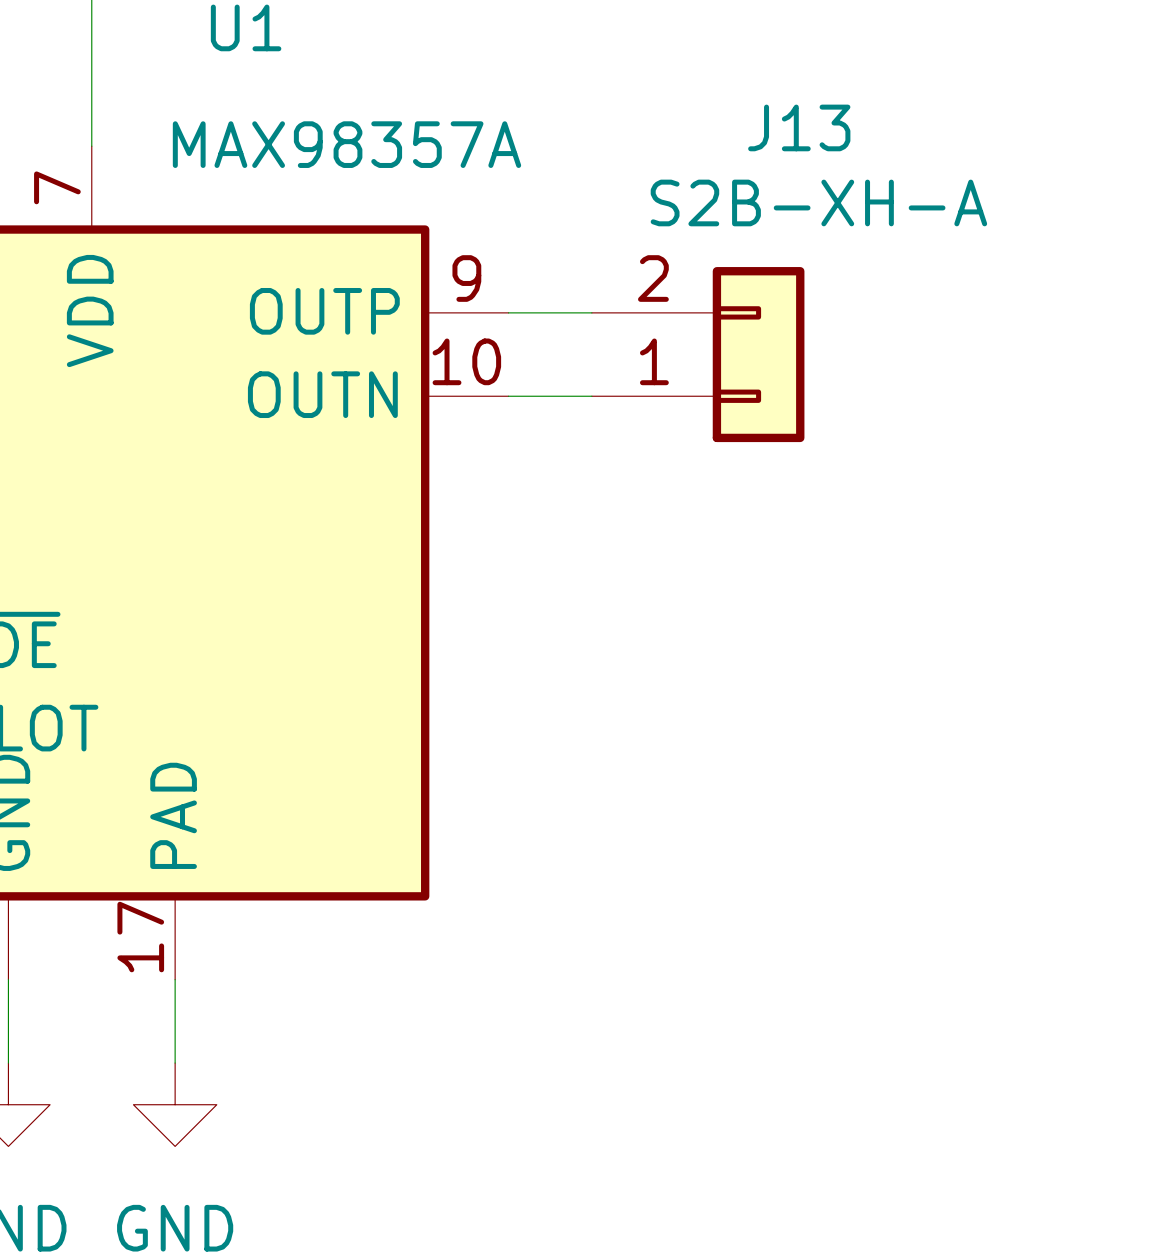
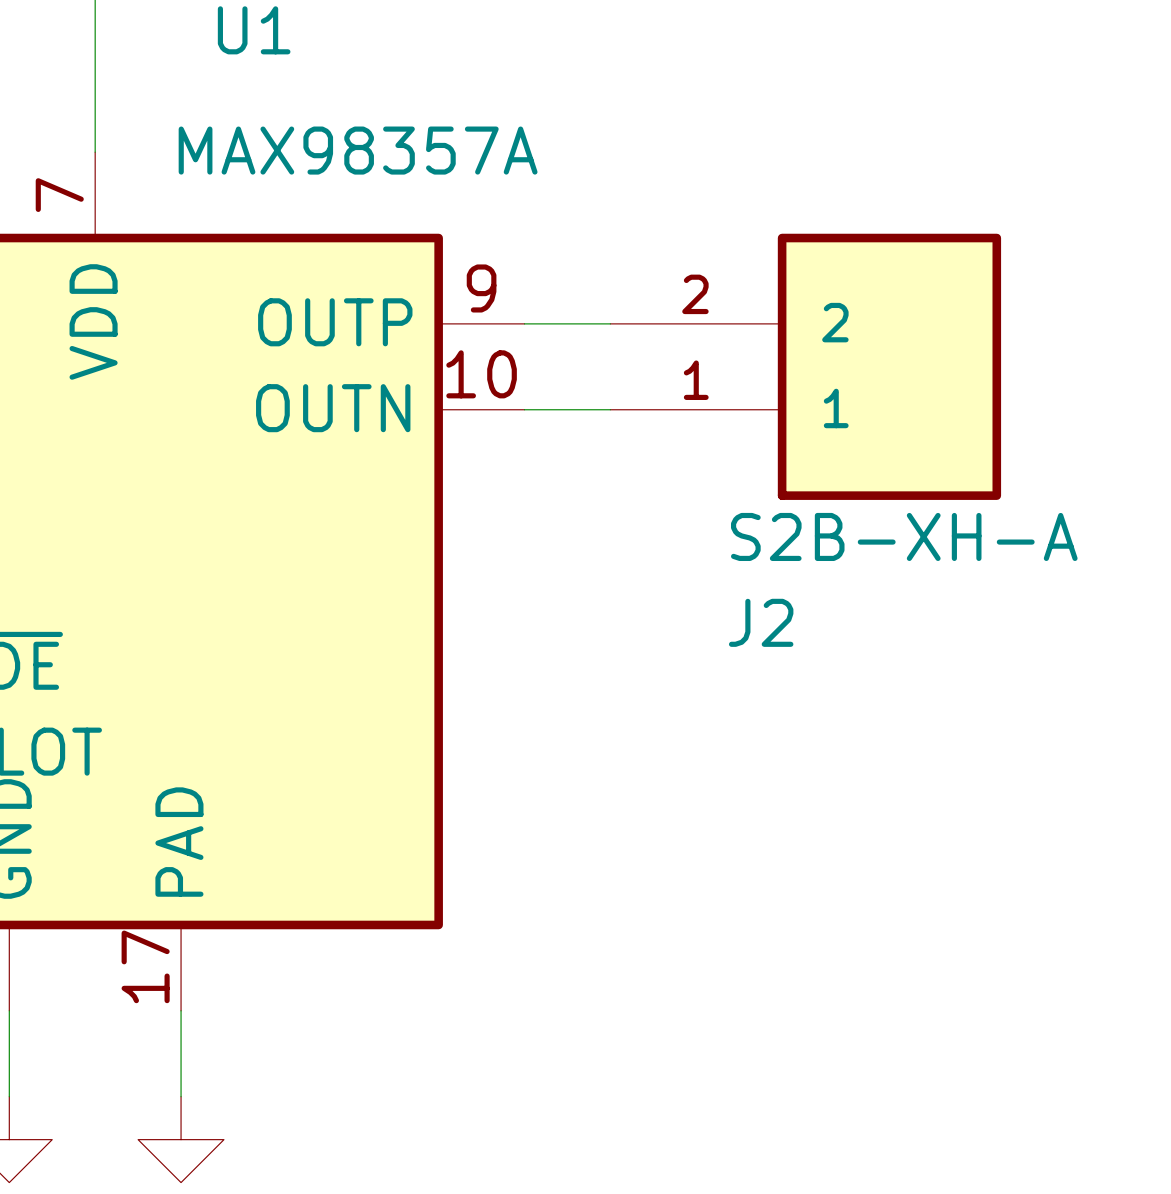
J13: S2B-XH-A (698, 354) -> none
J2: none -> S2B-XH-A (805, 366)

